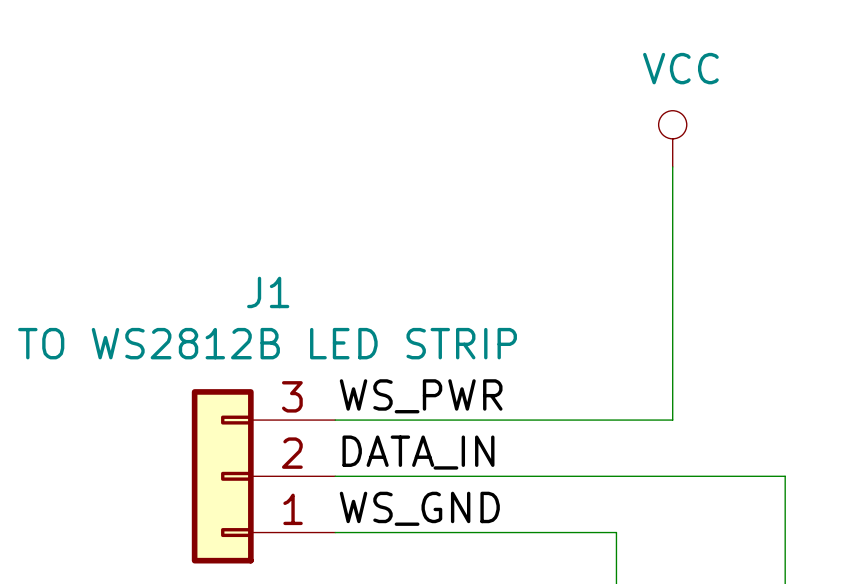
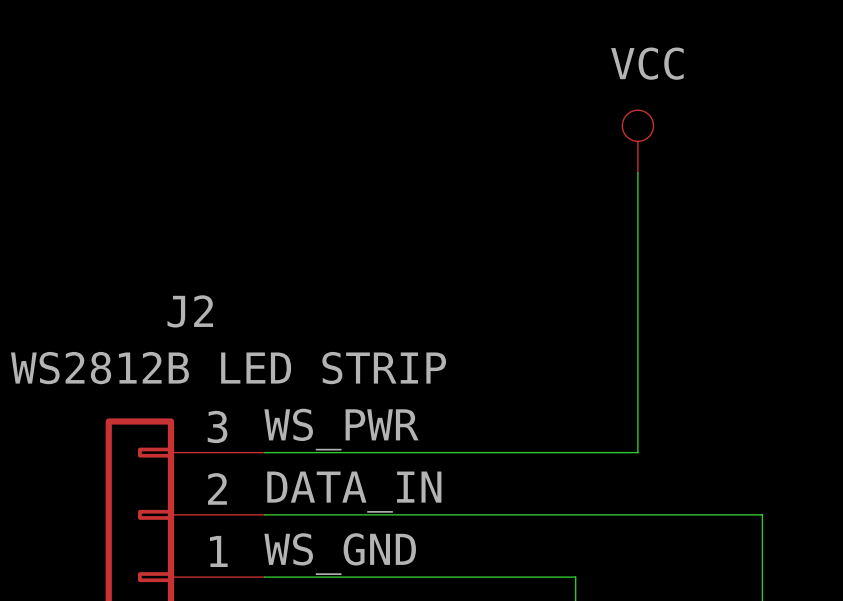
J1 name: J1 (268, 292) -> J2 (190, 311)

